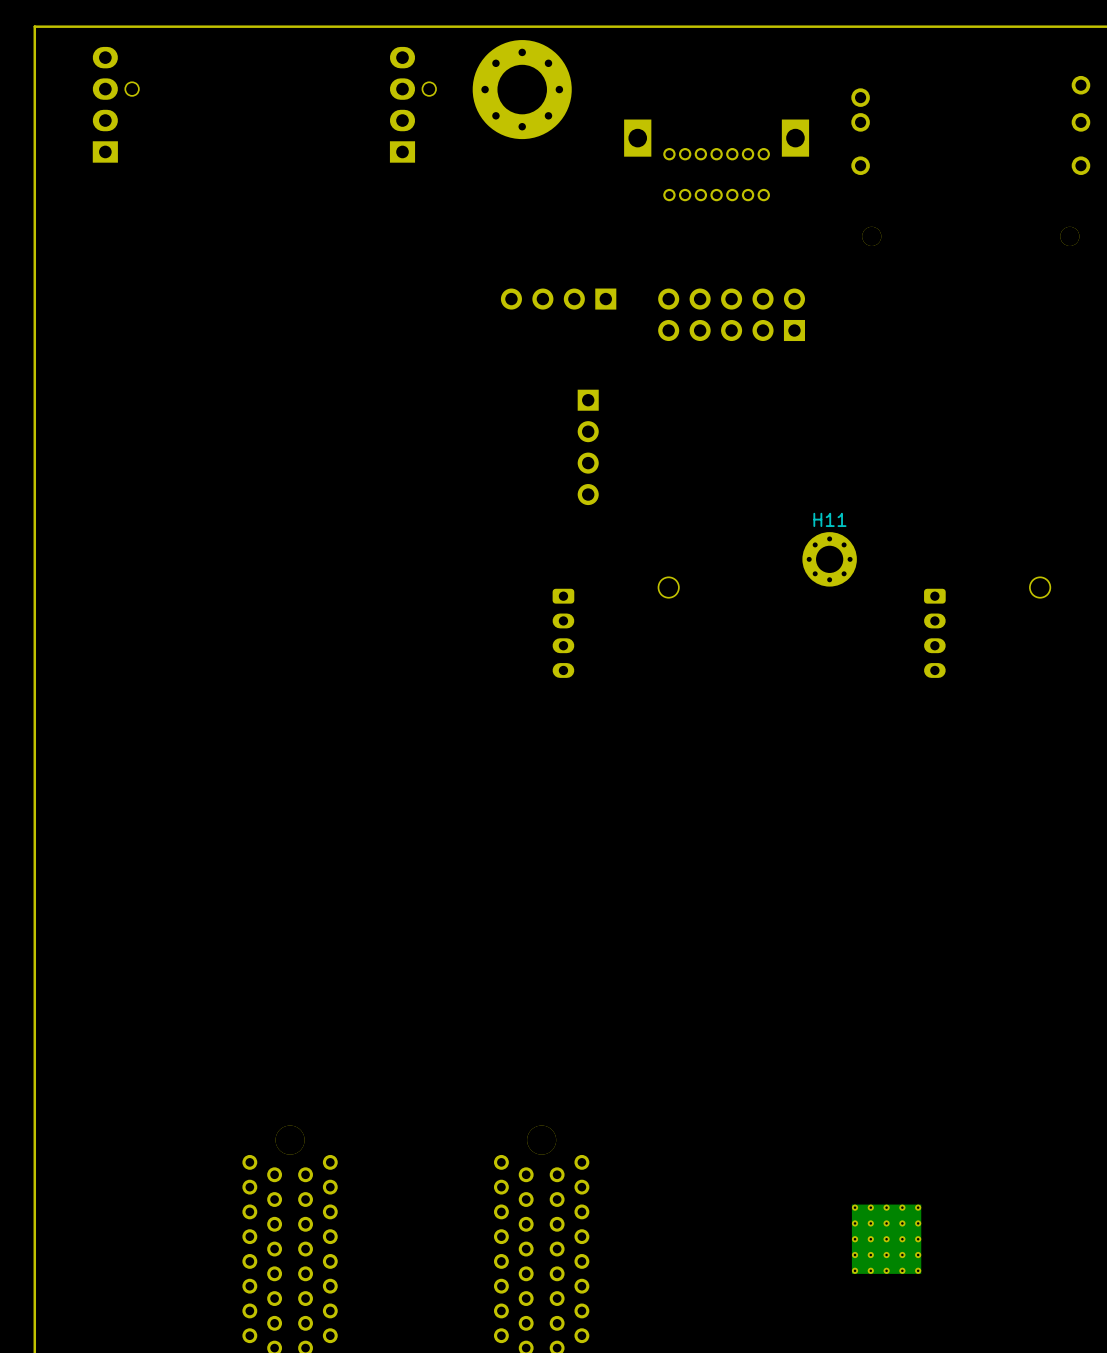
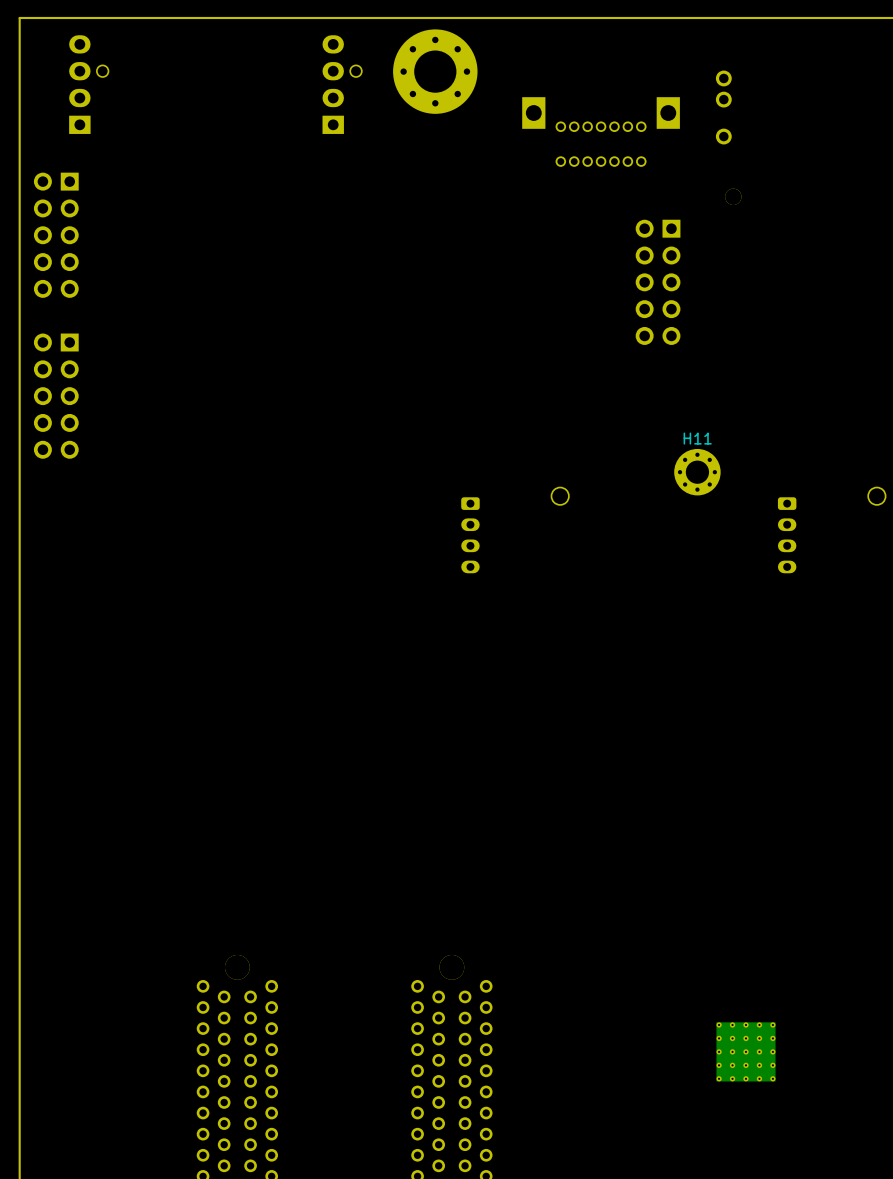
part: none -> (56, 235)
part: (558, 299) -> none
part rotation: 0° (731, 314) -> 90° counterclockwise (658, 282)
part: (588, 447) -> none
part: none -> (56, 396)

